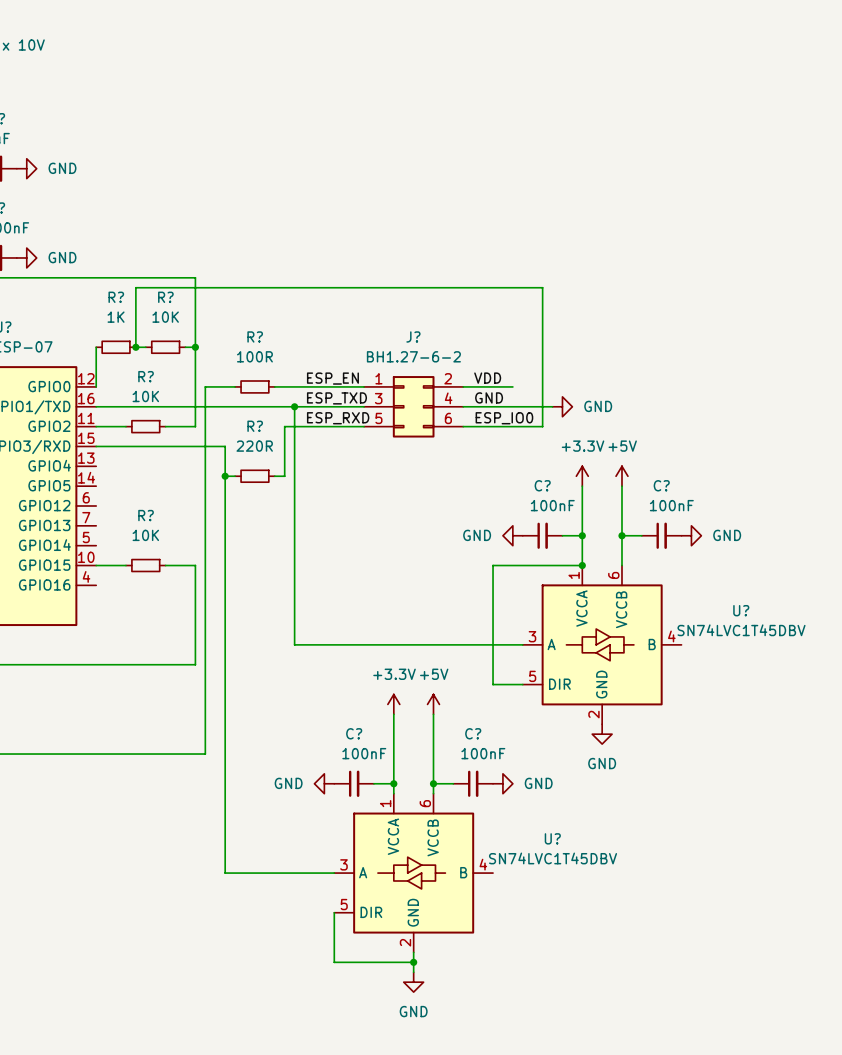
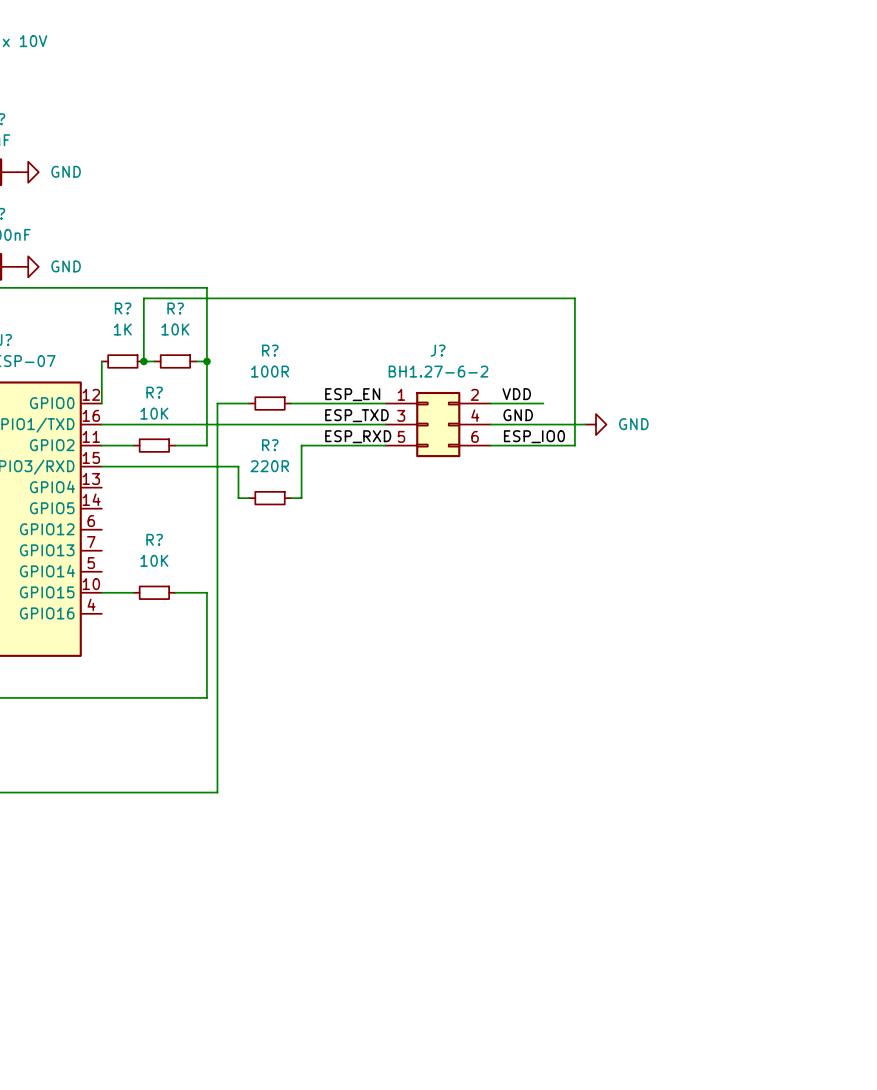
wire: (294, 406) (294, 644) (522, 644) -> none
junction: (294, 406) -> none
wire: (225, 476) (225, 873) (334, 873) -> none
junction: (225, 476) -> none
power symbol: +3.3V (582, 476) -> none
power symbol: +5V (621, 476) -> none
wire: (582, 486) (582, 565) (493, 565) (493, 684) (522, 684) -> none
wire: (621, 486) (621, 565) -> none
power symbol: GND (512, 535) -> none
C?: 100nF (542, 535) -> none
wire: (562, 535) (582, 535) -> none
junction: (582, 535) -> none
wire: (621, 535) (641, 535) -> none
junction: (621, 535) -> none
C?: 100nF (661, 535) -> none
power symbol: GND (691, 535) -> none
junction: (582, 565) -> none
U?: SN74LVC1T45DBV (602, 644) -> none
power symbol: +3.3V (393, 704) -> none
power symbol: +5V (433, 704) -> none
wire: (393, 714) (393, 793) -> none
wire: (433, 714) (433, 793) -> none
power symbol: GND (602, 734) -> none
power symbol: GND (324, 783) -> none
C?: 100nF (354, 783) -> none
wire: (373, 783) (393, 783) -> none
junction: (393, 783) -> none
wire: (433, 783) (453, 783) -> none
junction: (433, 783) -> none
C?: 100nF (473, 783) -> none
power symbol: GND (502, 783) -> none
U?: SN74LVC1T45DBV (413, 873) -> none
wire: (334, 912) (334, 962) (413, 962) -> none
wire: (413, 952) (413, 972) -> none
junction: (413, 962) -> none
power symbol: GND (413, 982) -> none

